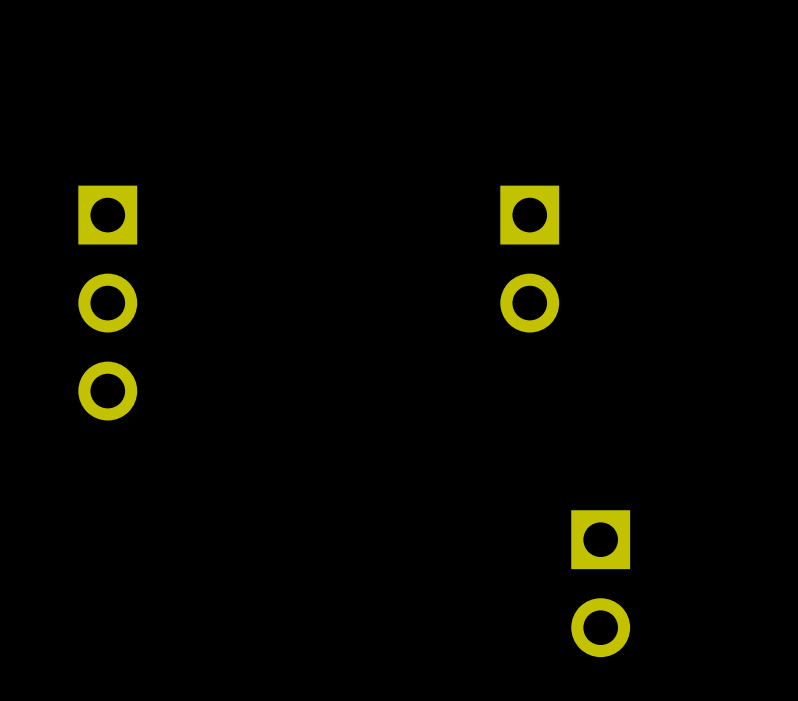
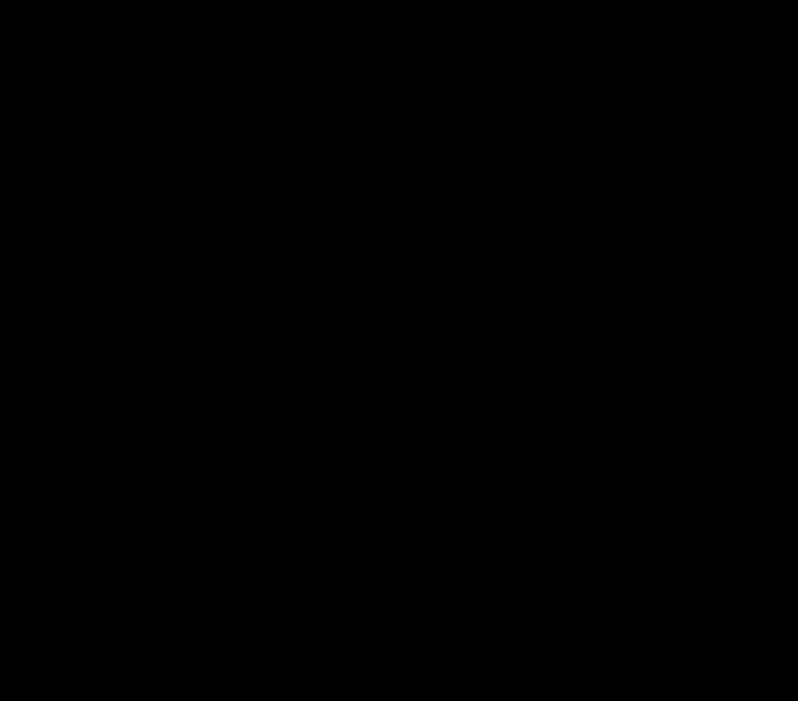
part: (529, 259) -> none
part: (107, 303) -> none
part: (600, 583) -> none

